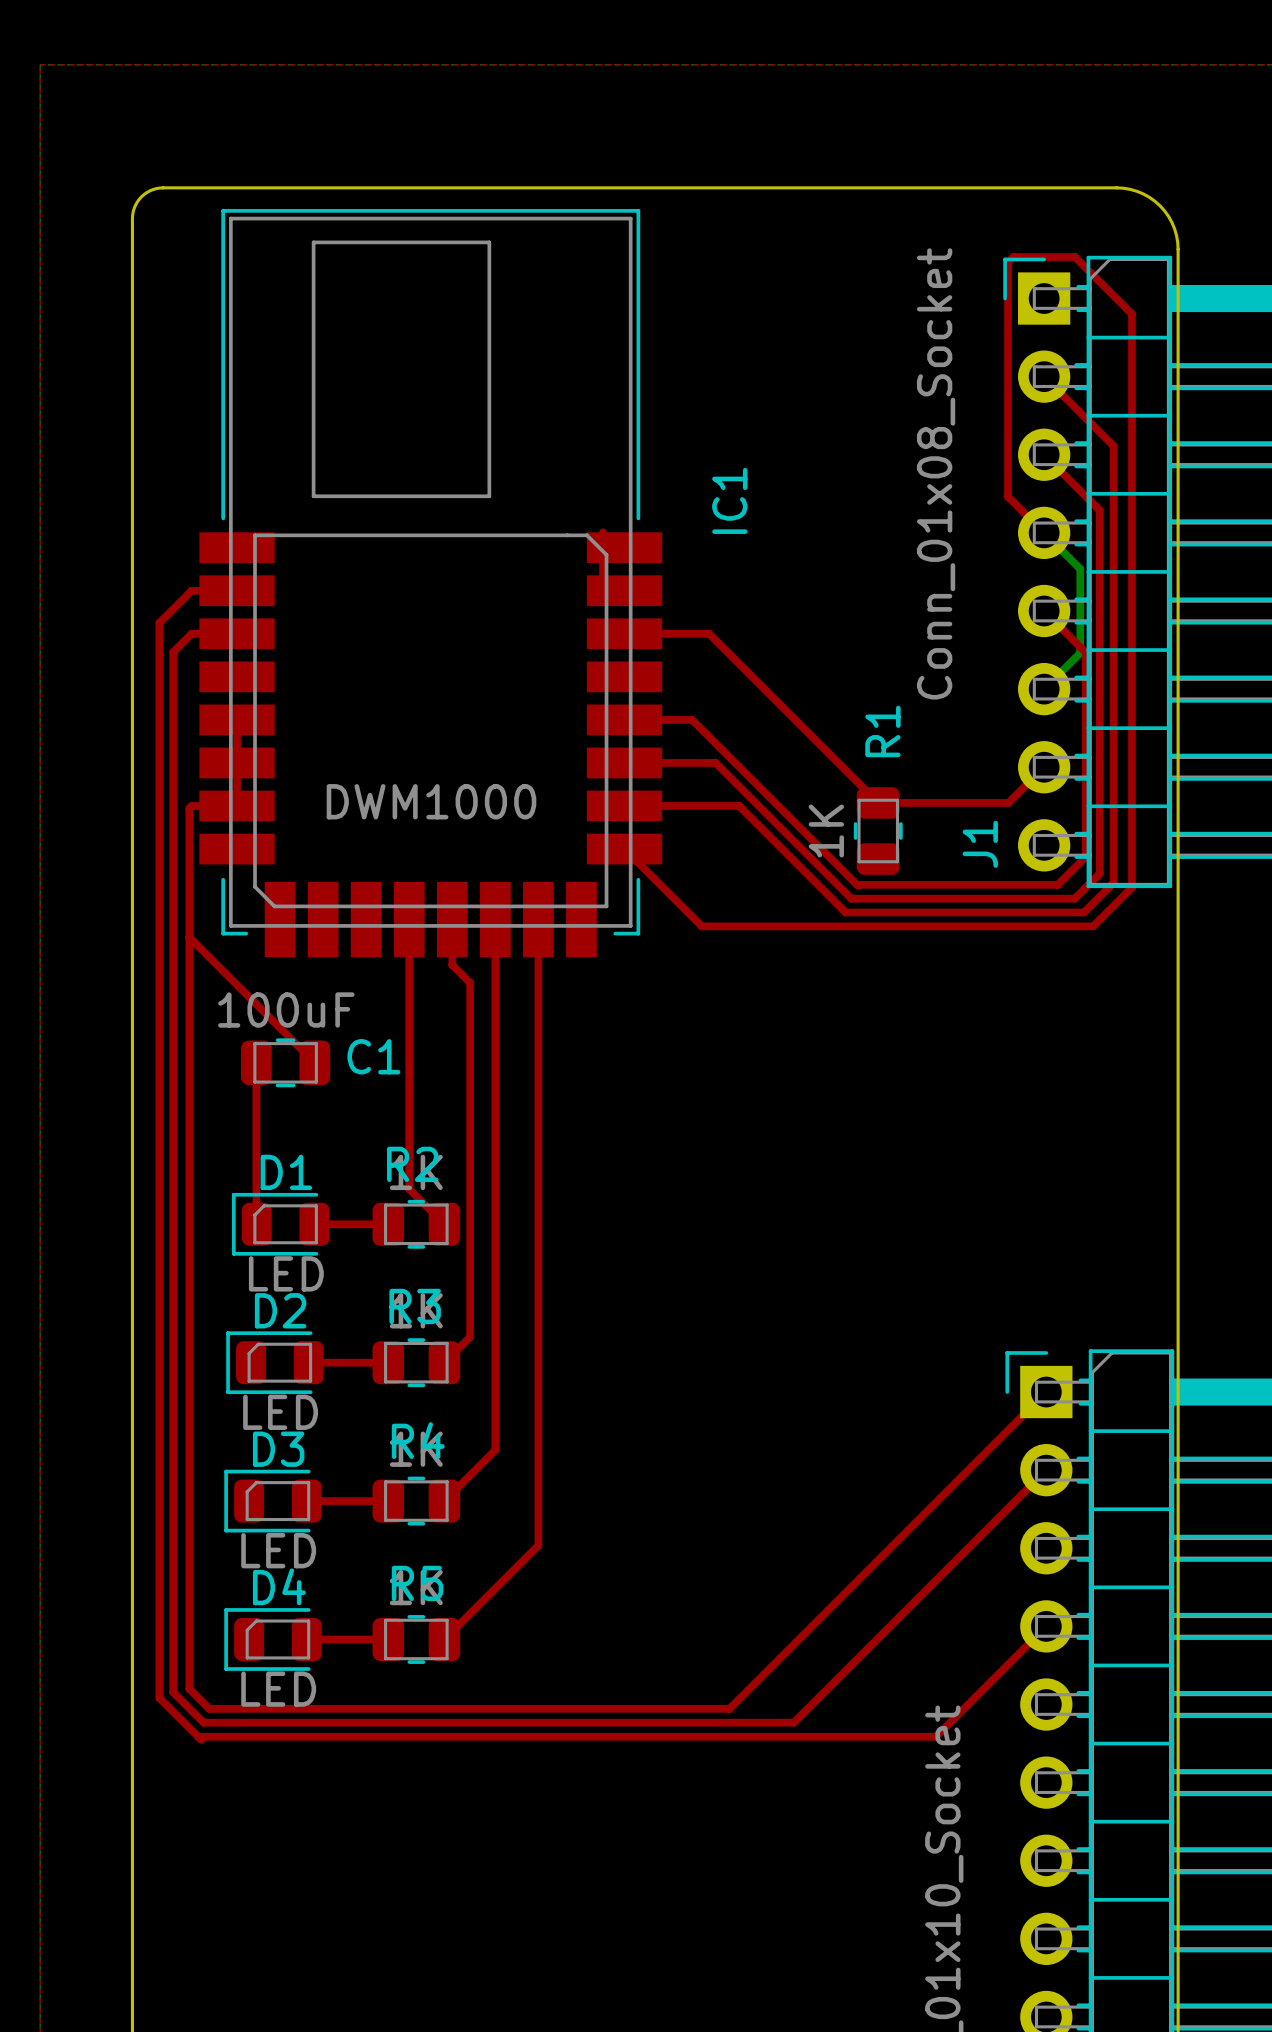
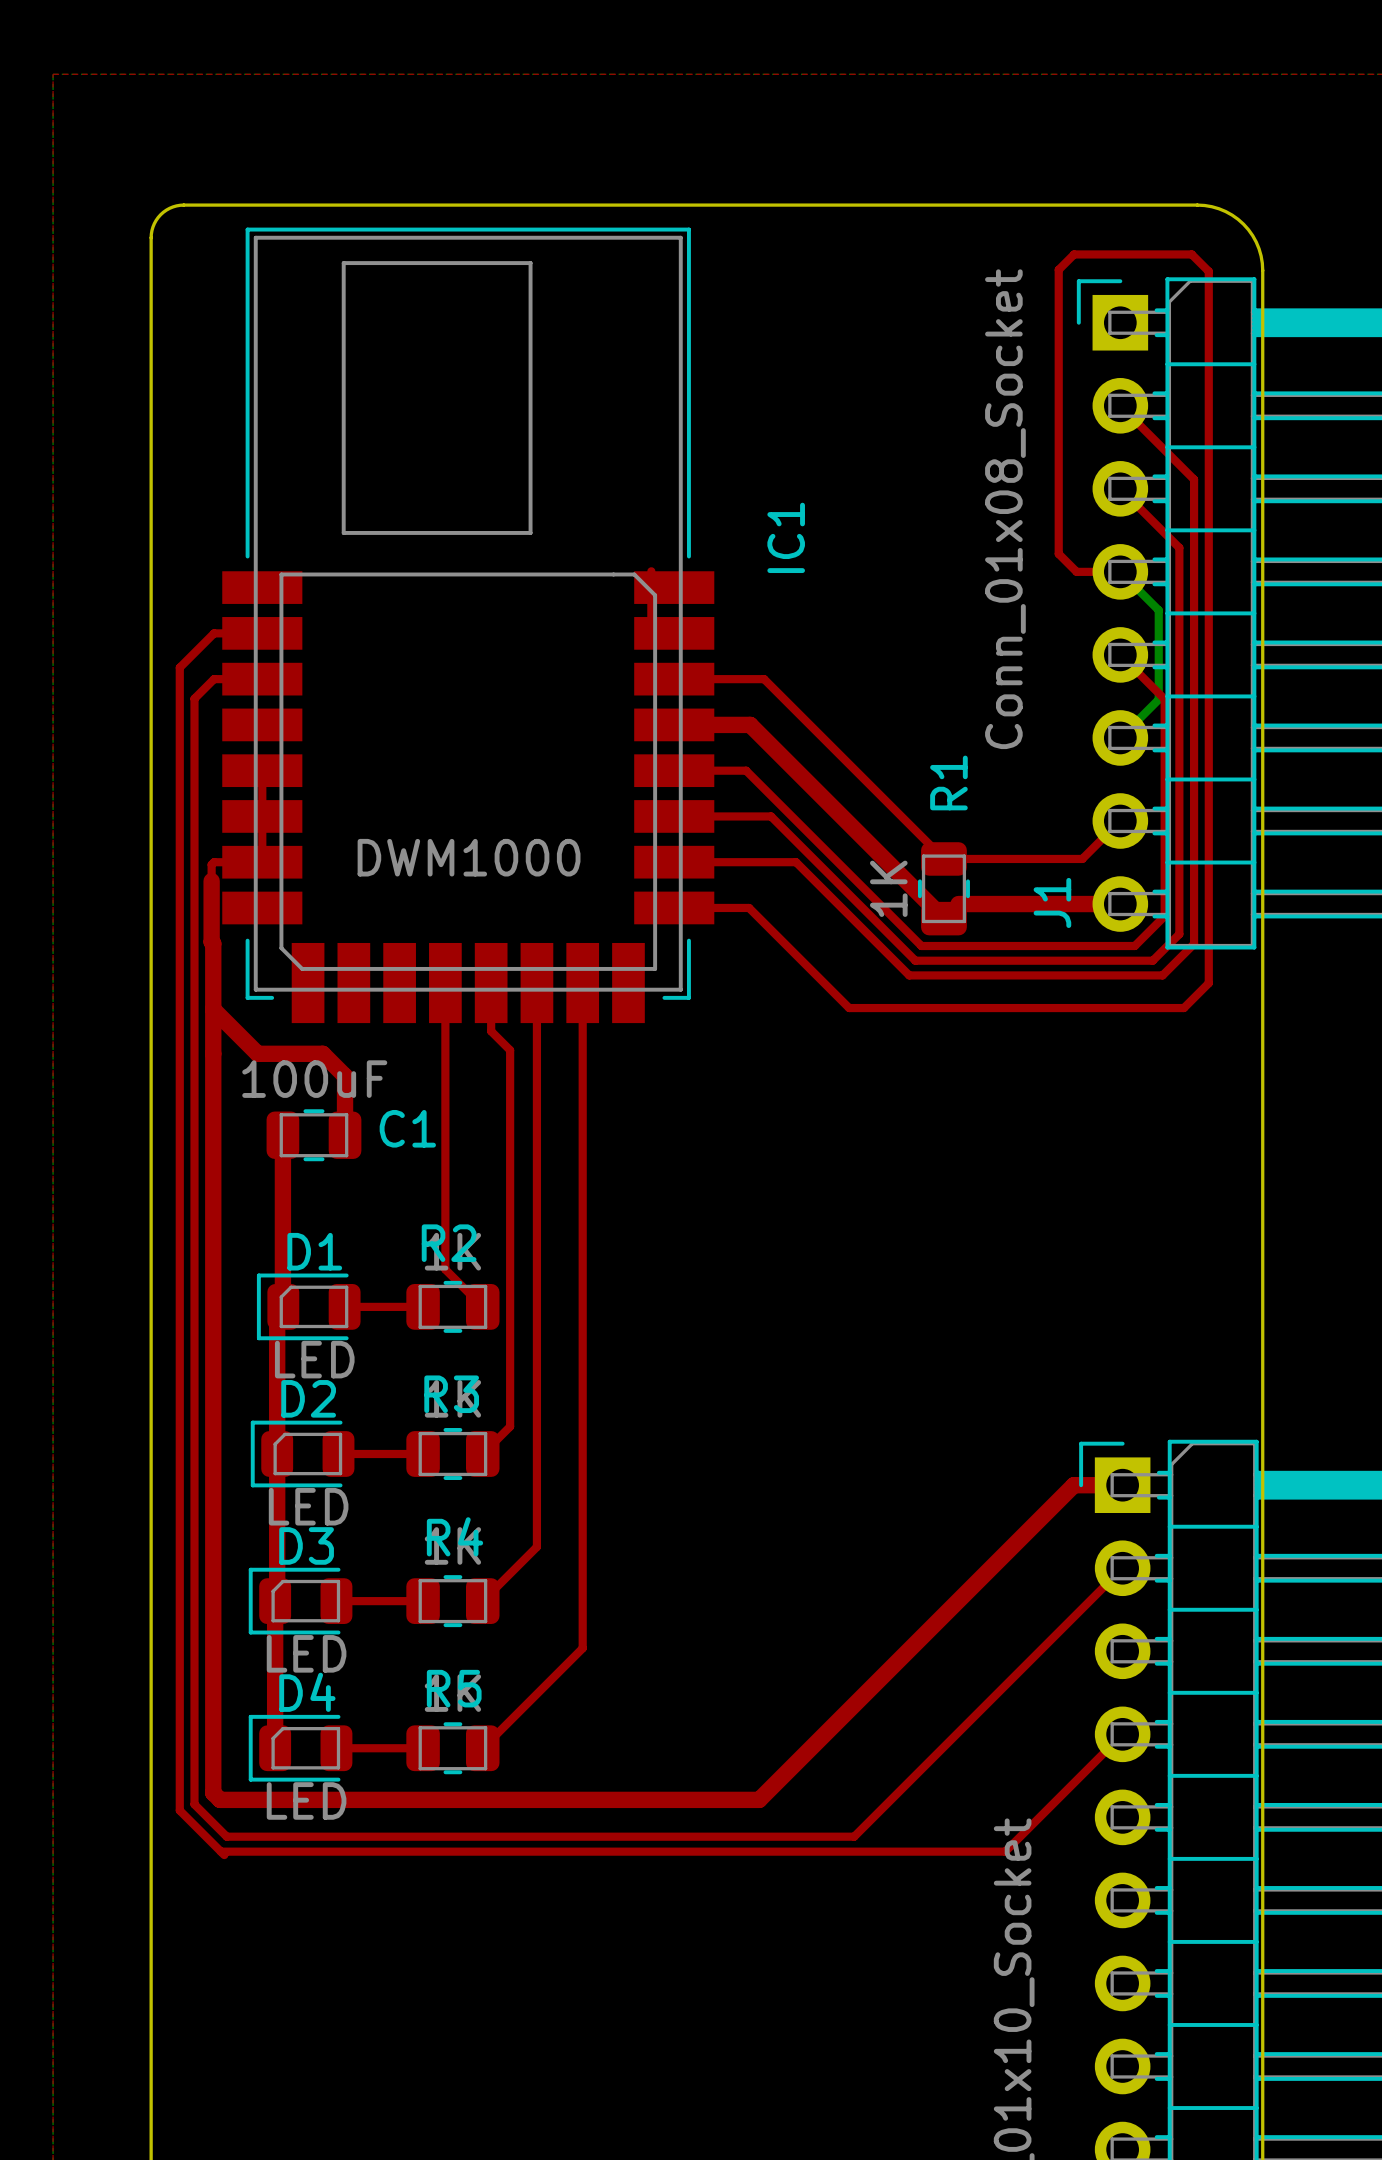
top track: (1044, 532) (1008, 496) (1008, 262) (1013, 257) (1074, 257) (1131, 314) (1131, 887) (1093, 926) (701, 926) (624, 849) -> (1120, 571) (1076, 571) (1058, 553) (1058, 269) (1074, 254) (1191, 254) (1208, 271) (1208, 983) (1183, 1008) (849, 1008) (749, 907) (674, 907)
top track: none -> (674, 724) (750, 724) (943, 918) (958, 904) (1120, 904)
top track width: thin (189, 823) (189, 881) -> thick (211, 881) (211, 942)
top track: (189, 881) (189, 1688) (209, 1708) (729, 1708) (1046, 1392) -> (211, 942) (213, 943) (213, 1793) (220, 1799) (759, 1799) (1073, 1485) (1122, 1485)
top track: (189, 937) (314, 1062) -> (213, 1009) (257, 1053) (322, 1053) (345, 1076) (345, 1135)
top track width: thin (256, 1062) (256, 1223) -> thick (282, 1135) (282, 1306)
top track: none -> (282, 1306) (277, 1312) (275, 1748)

